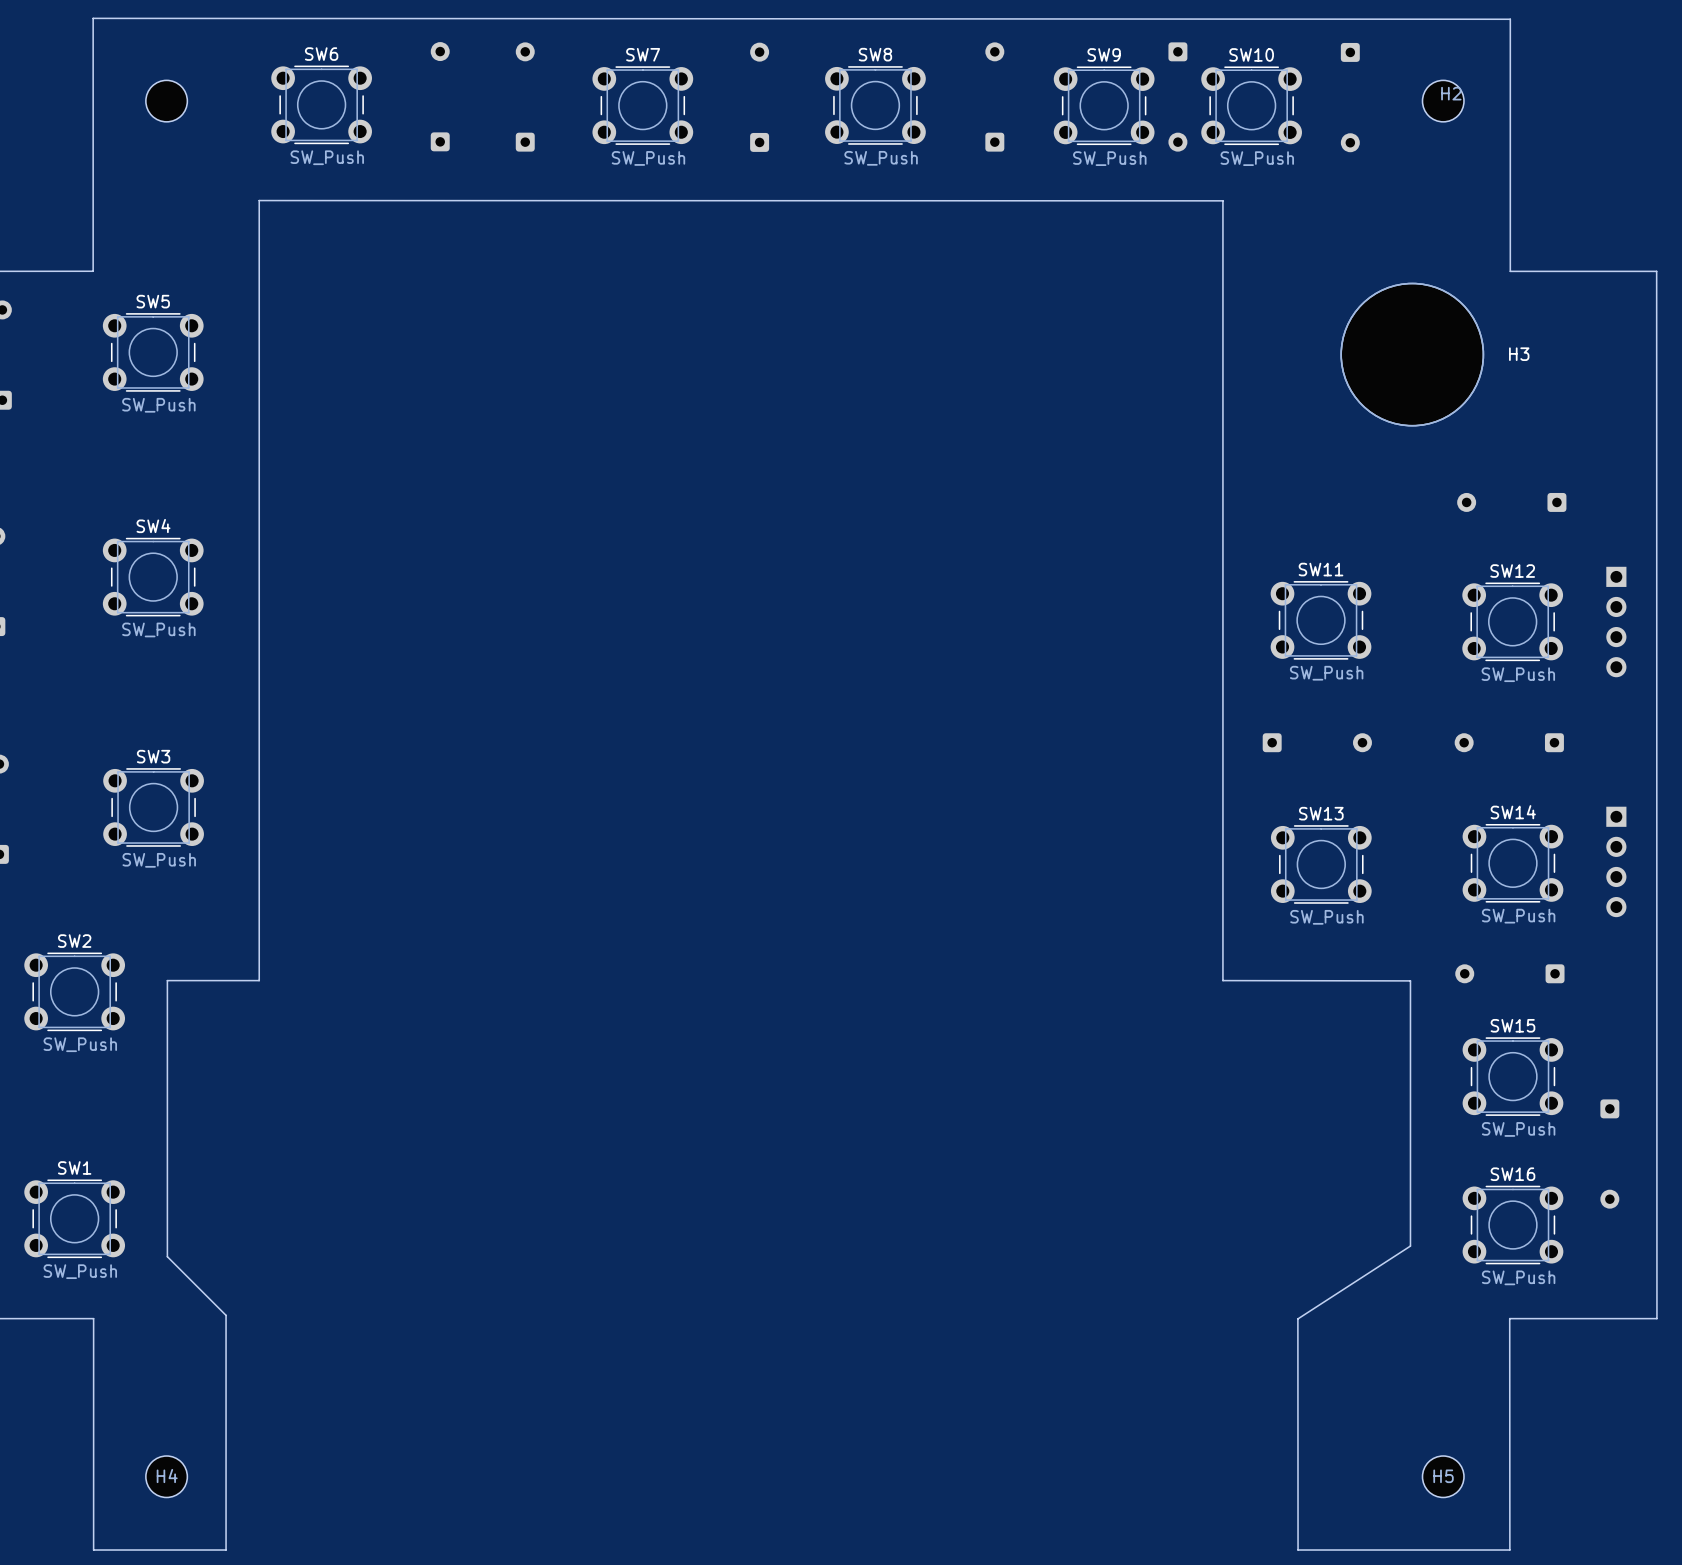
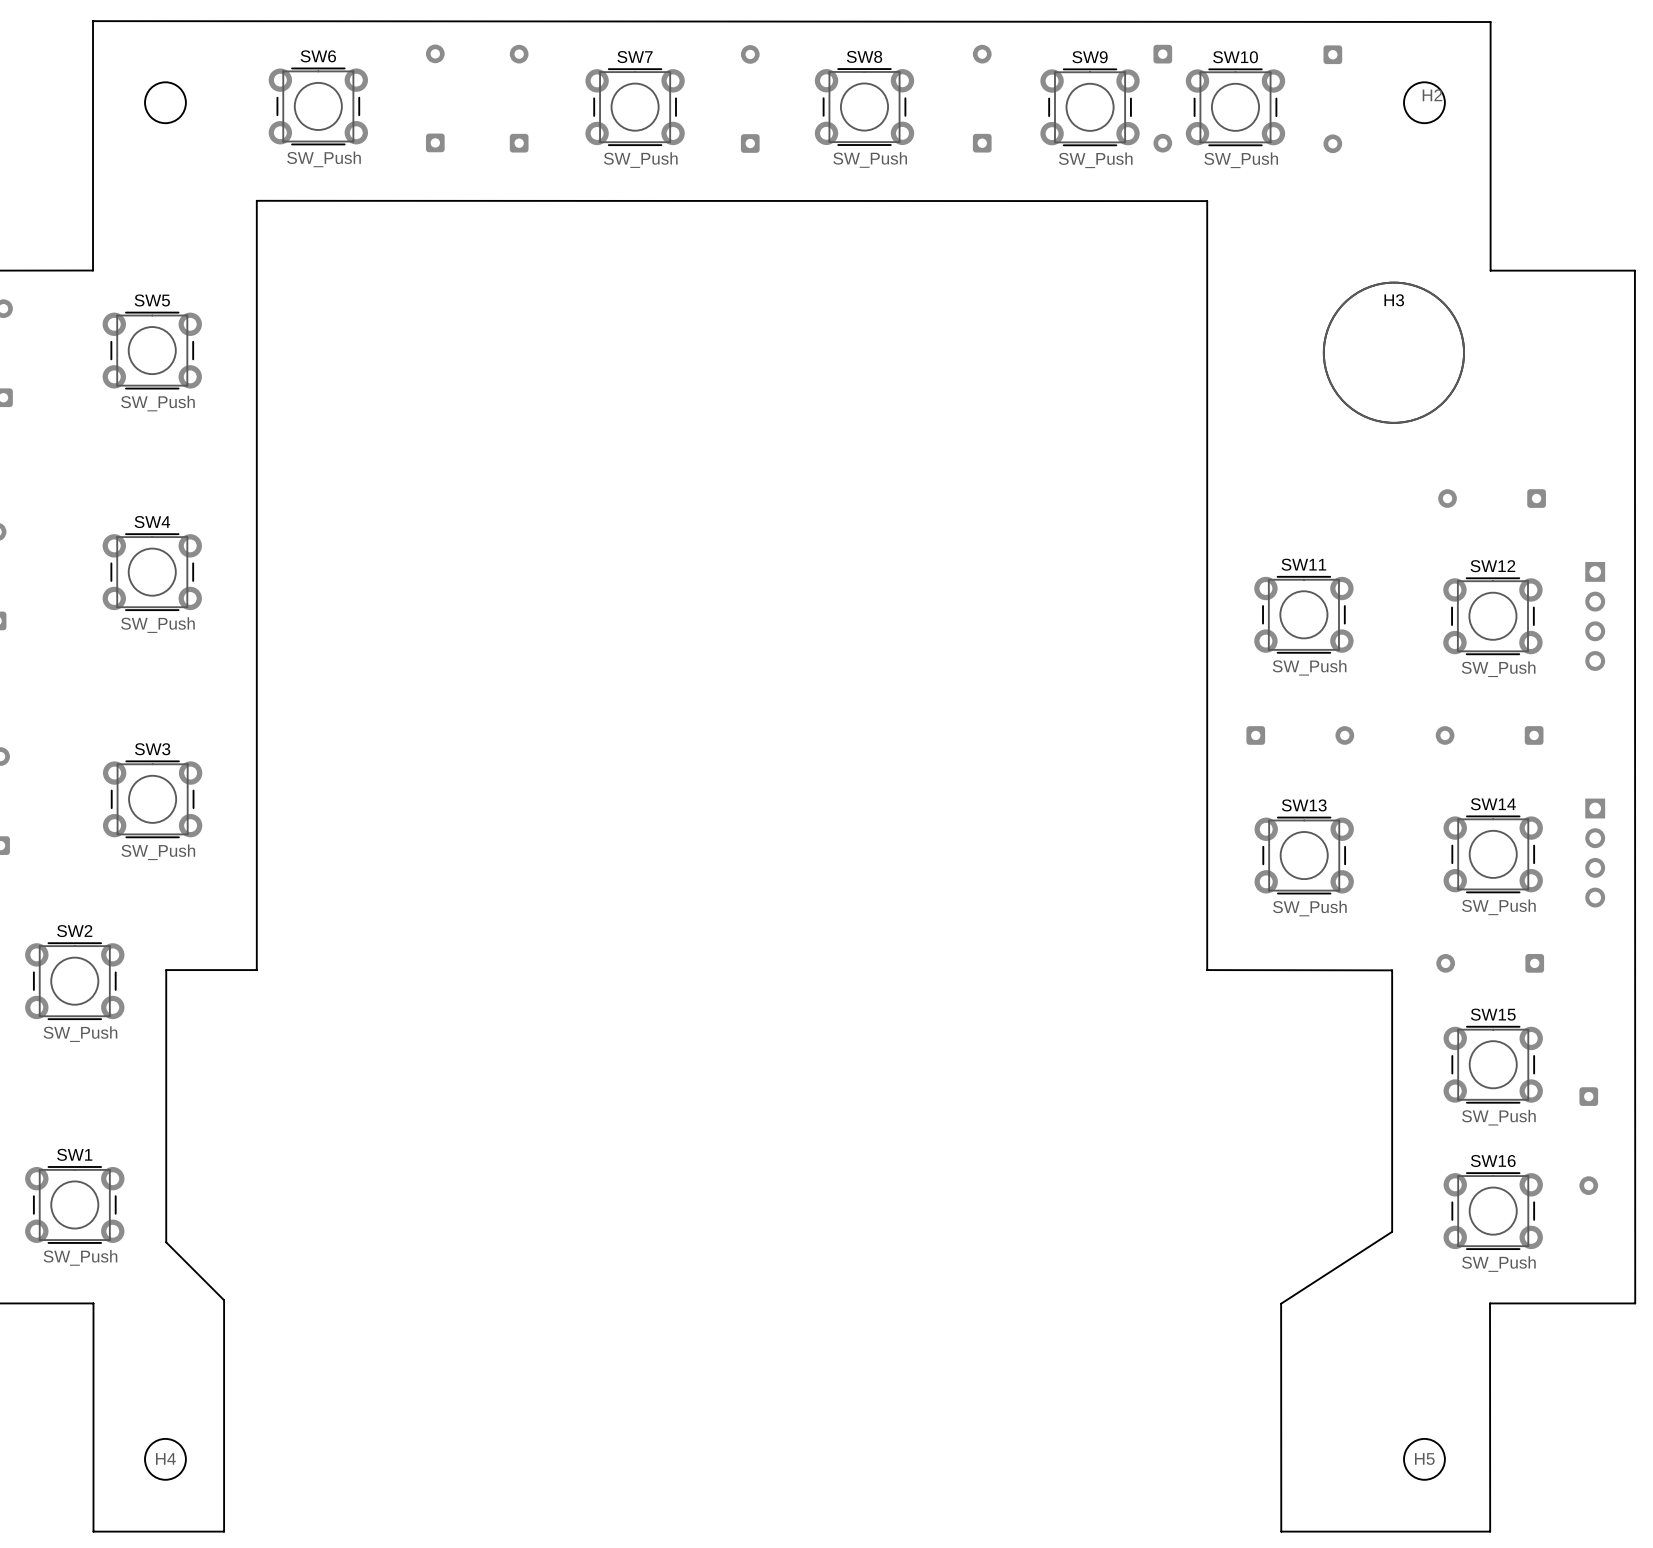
H3 name position: H3 (1519, 354) -> H3 (1394, 300)

